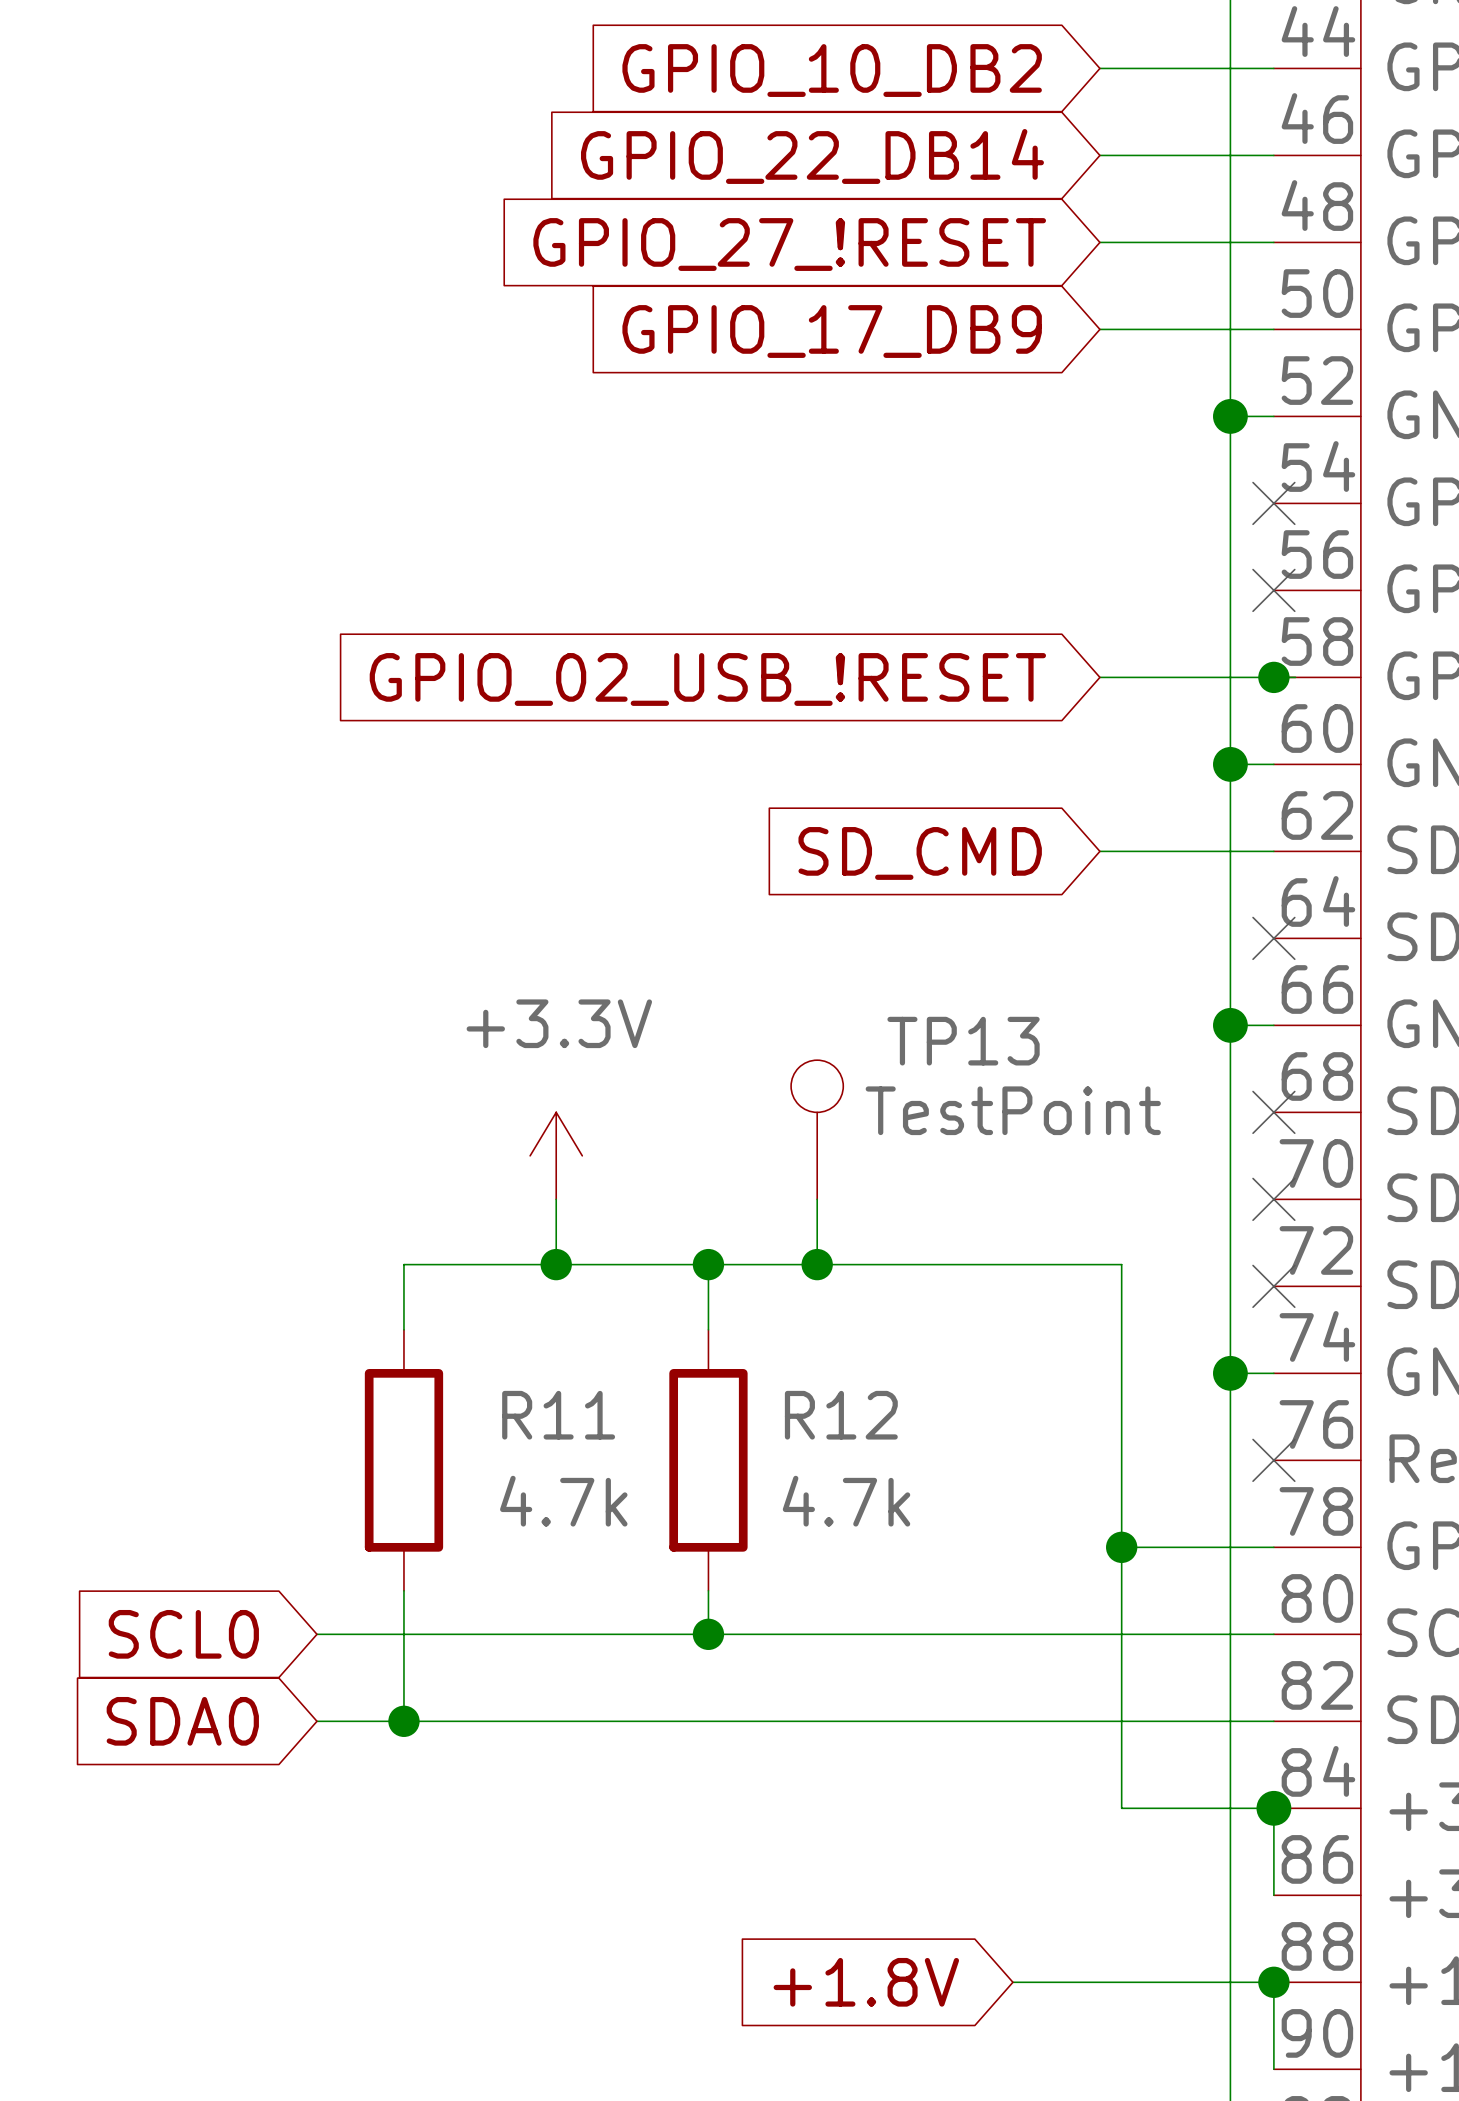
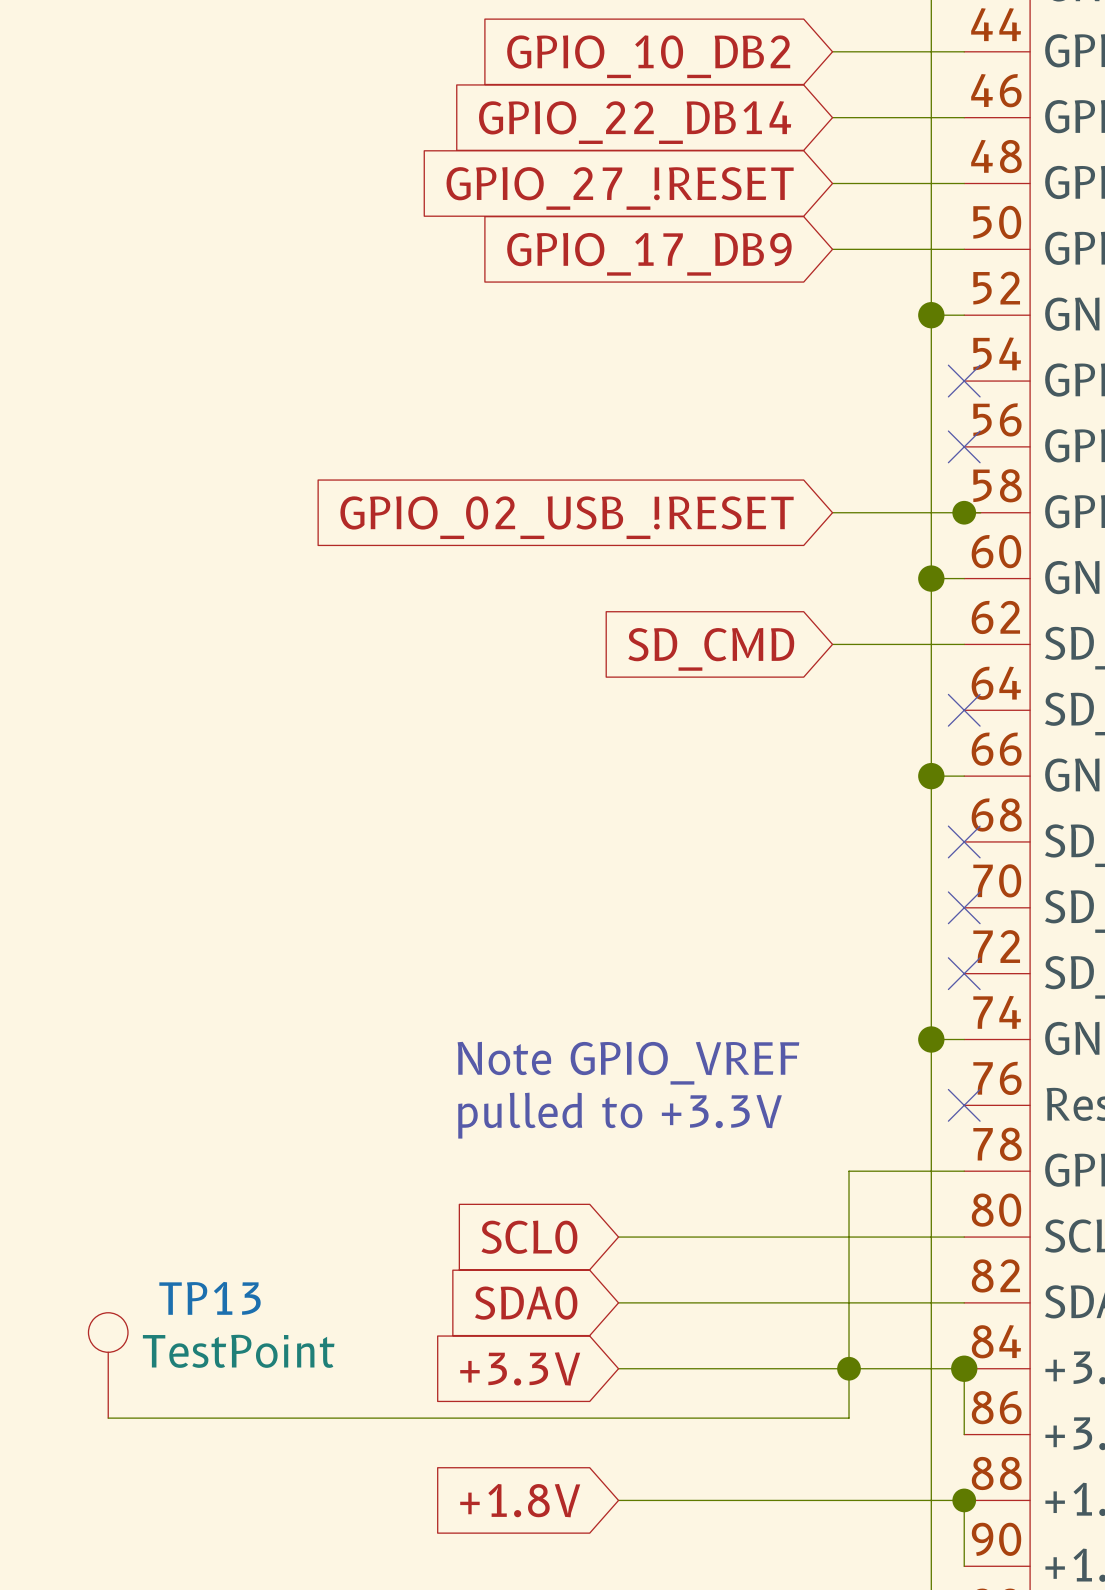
TP13 position: (817, 1129) -> (108, 1365)
power symbol: +3.3V (556, 1155) -> none
wire: (556, 1199) (556, 1264) -> none
wire: (817, 1199) (817, 1264) -> none
junction: (556, 1264) -> none
wire: (708, 1264) (708, 1329) -> none
junction: (708, 1264) -> none
junction: (817, 1264) -> none
wire: (403, 1329) (403, 1264) (1121, 1264) (1121, 1547) -> none
text: none -> Note GPIO_VREF (628, 1063)
R11: 4.7k (403, 1460) -> none
R12: 4.7k (708, 1460) -> none
text: none -> pulled to +3.3V (620, 1115)
junction: (1121, 1547) -> none
wire: (403, 1590) (403, 1721) -> none
wire: (708, 1590) (708, 1634) -> none
global label position: SCL0 (183, 1634) -> SCL0 (529, 1237)
wire: (316, 1634) (817, 1634) -> none
junction: (708, 1634) -> none
global label position: SDA0 (182, 1721) -> SDA0 (526, 1303)
wire: (316, 1721) (817, 1721) -> none
junction: (403, 1721) -> none
global label: none -> +3.3V (520, 1368)
wire: none -> (618, 1368) (849, 1368) (849, 1418) (108, 1418)
junction: none -> (849, 1368)
wire: none -> (618, 1500) (766, 1500)
global label position: +1.8V (866, 1982) -> +1.8V (520, 1500)

